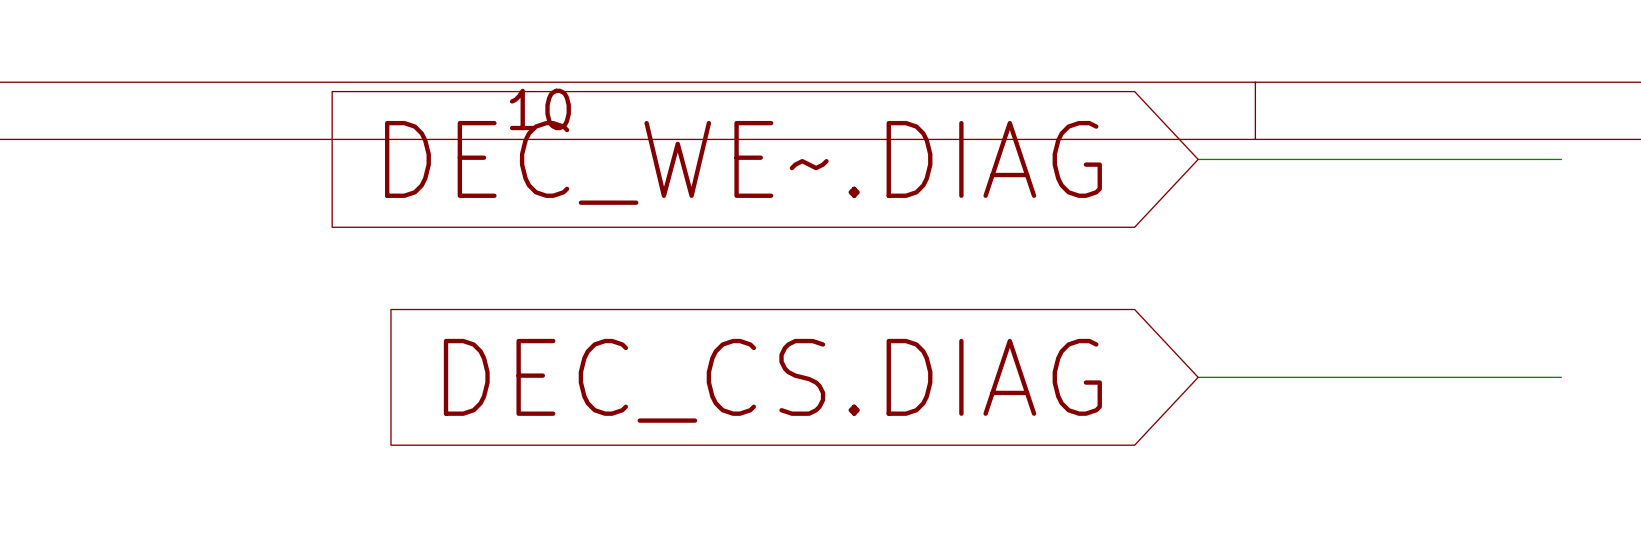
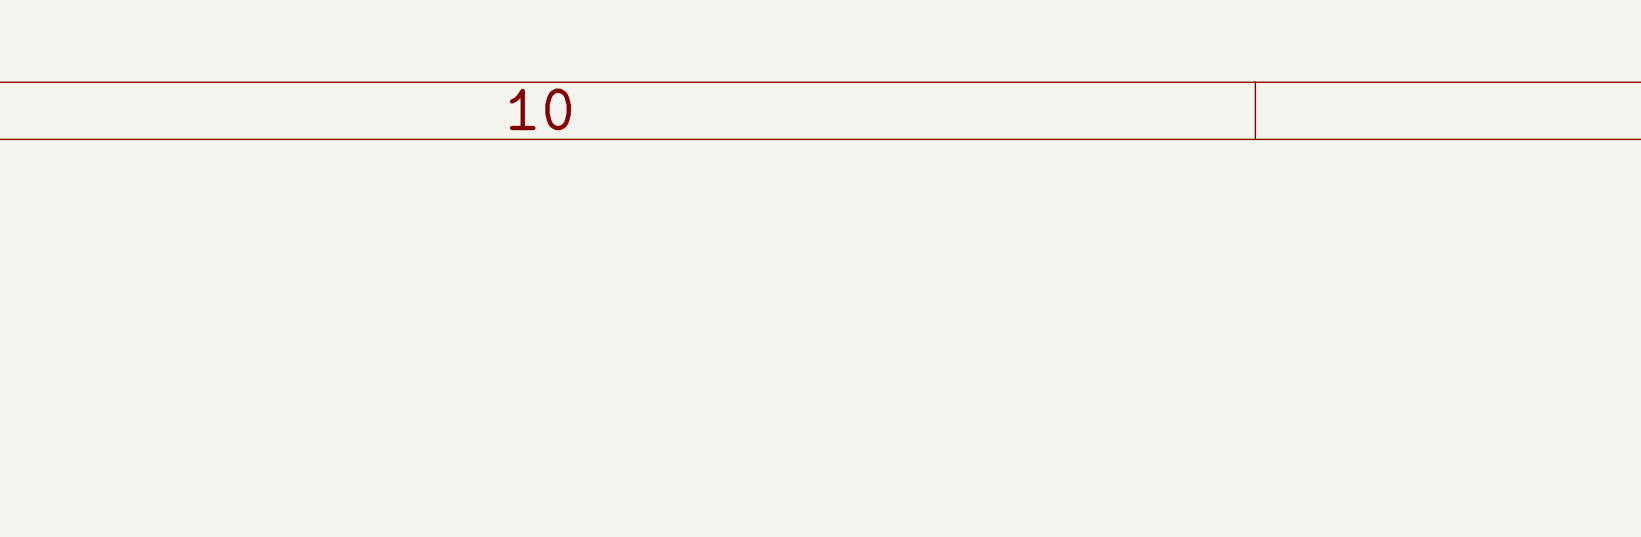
wire: (1198, 159) (1561, 159) -> none
global label: DEC_WE~.DIAG (743, 162) -> none
wire: (1198, 377) (1561, 377) -> none
global label: DEC_CS.DIAG (772, 380) -> none

